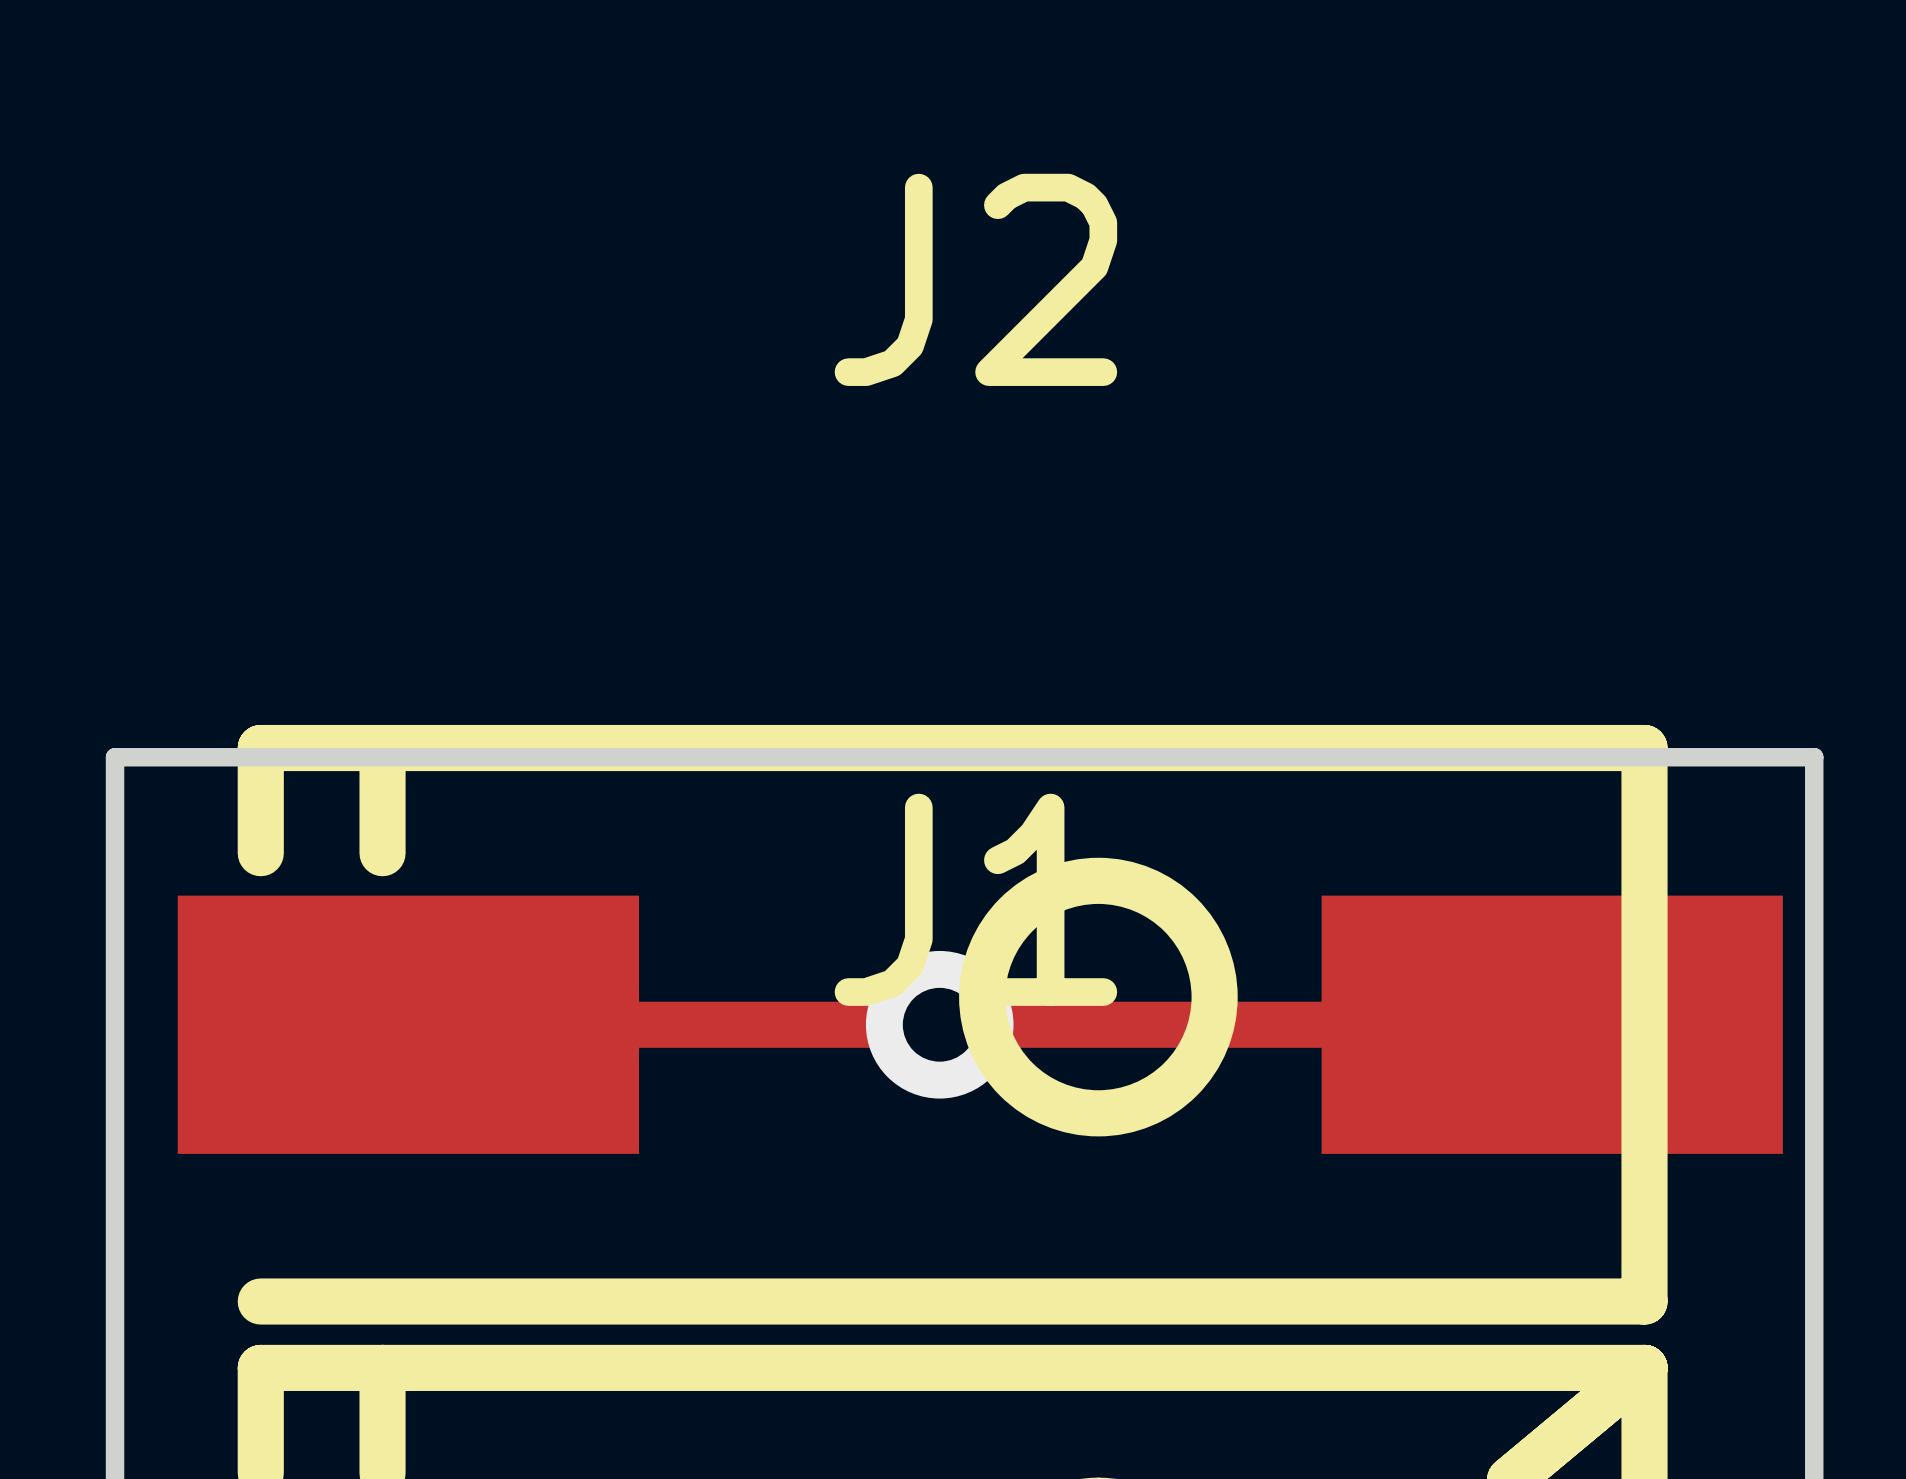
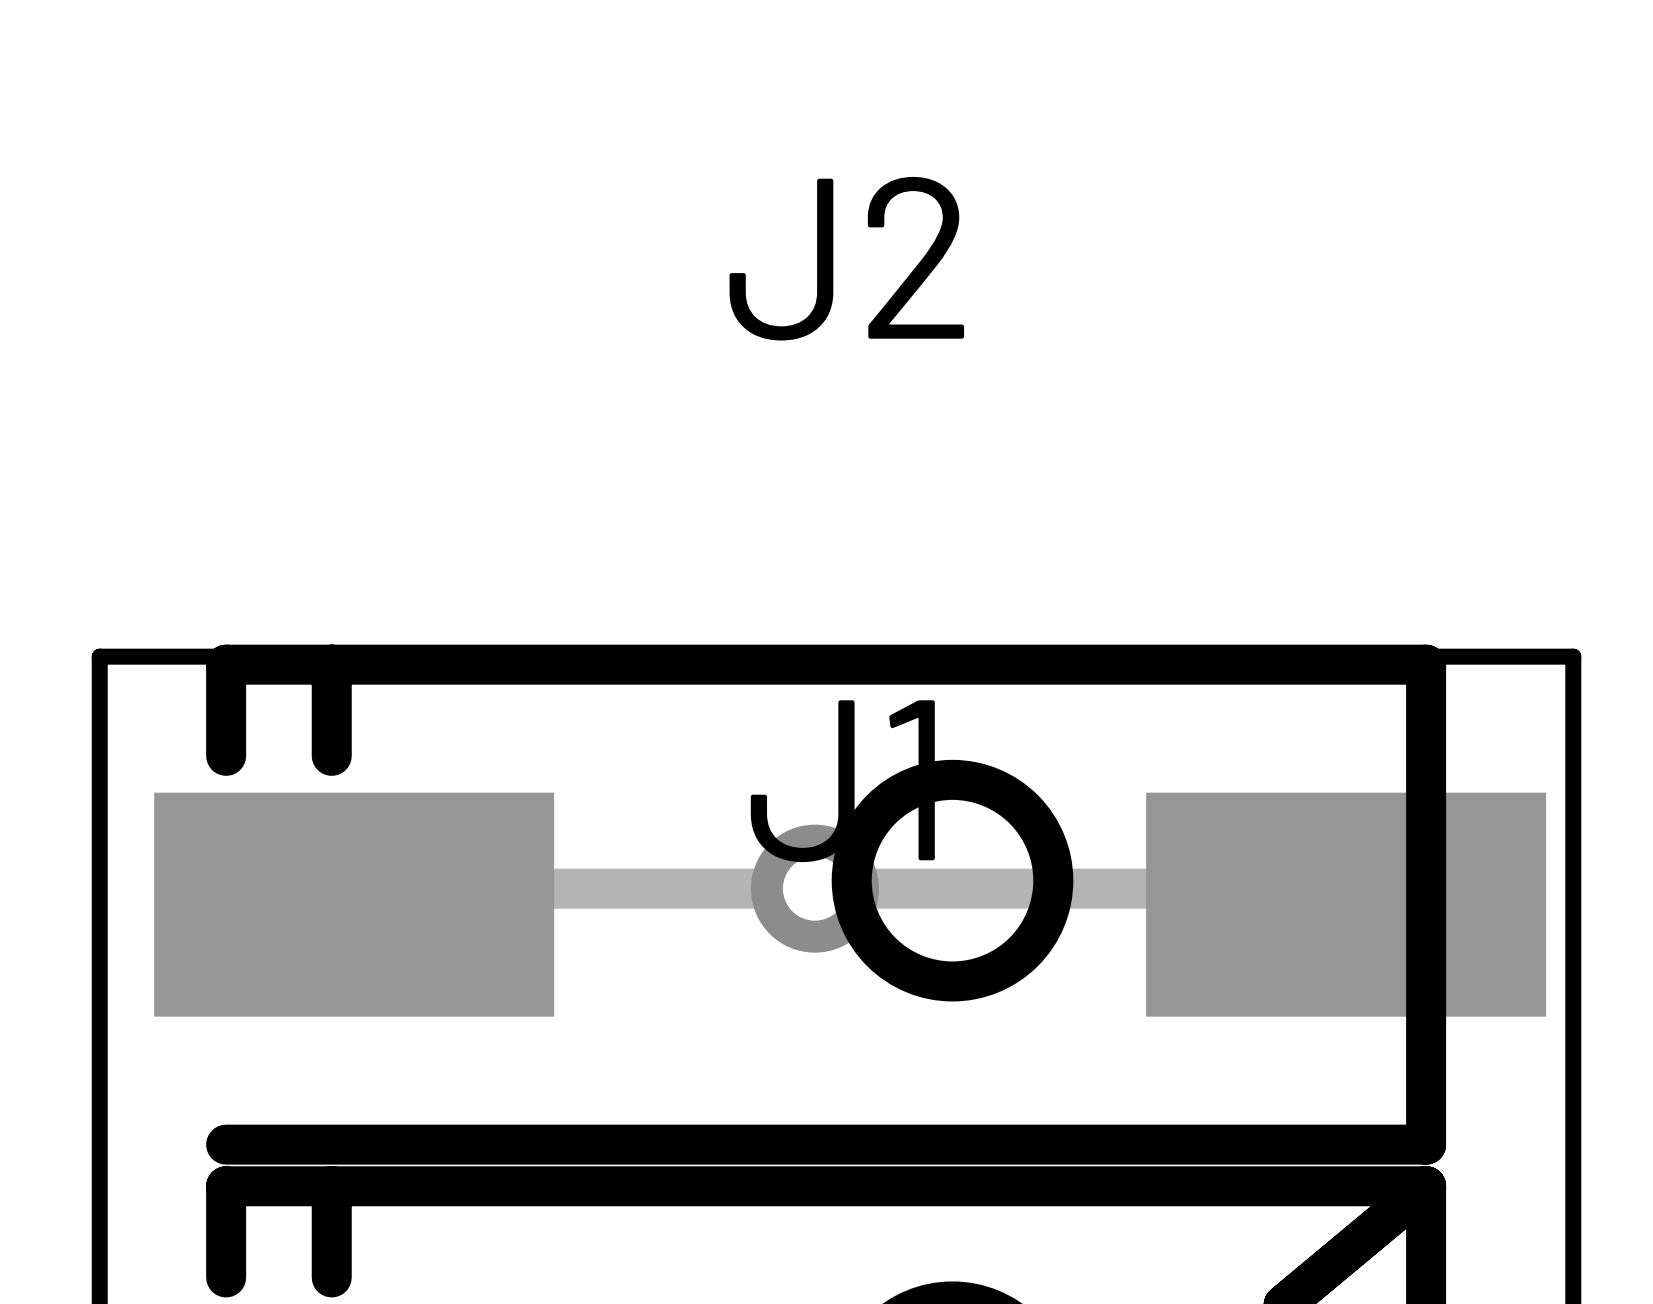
J2 position: (980, 1024) -> (850, 904)

